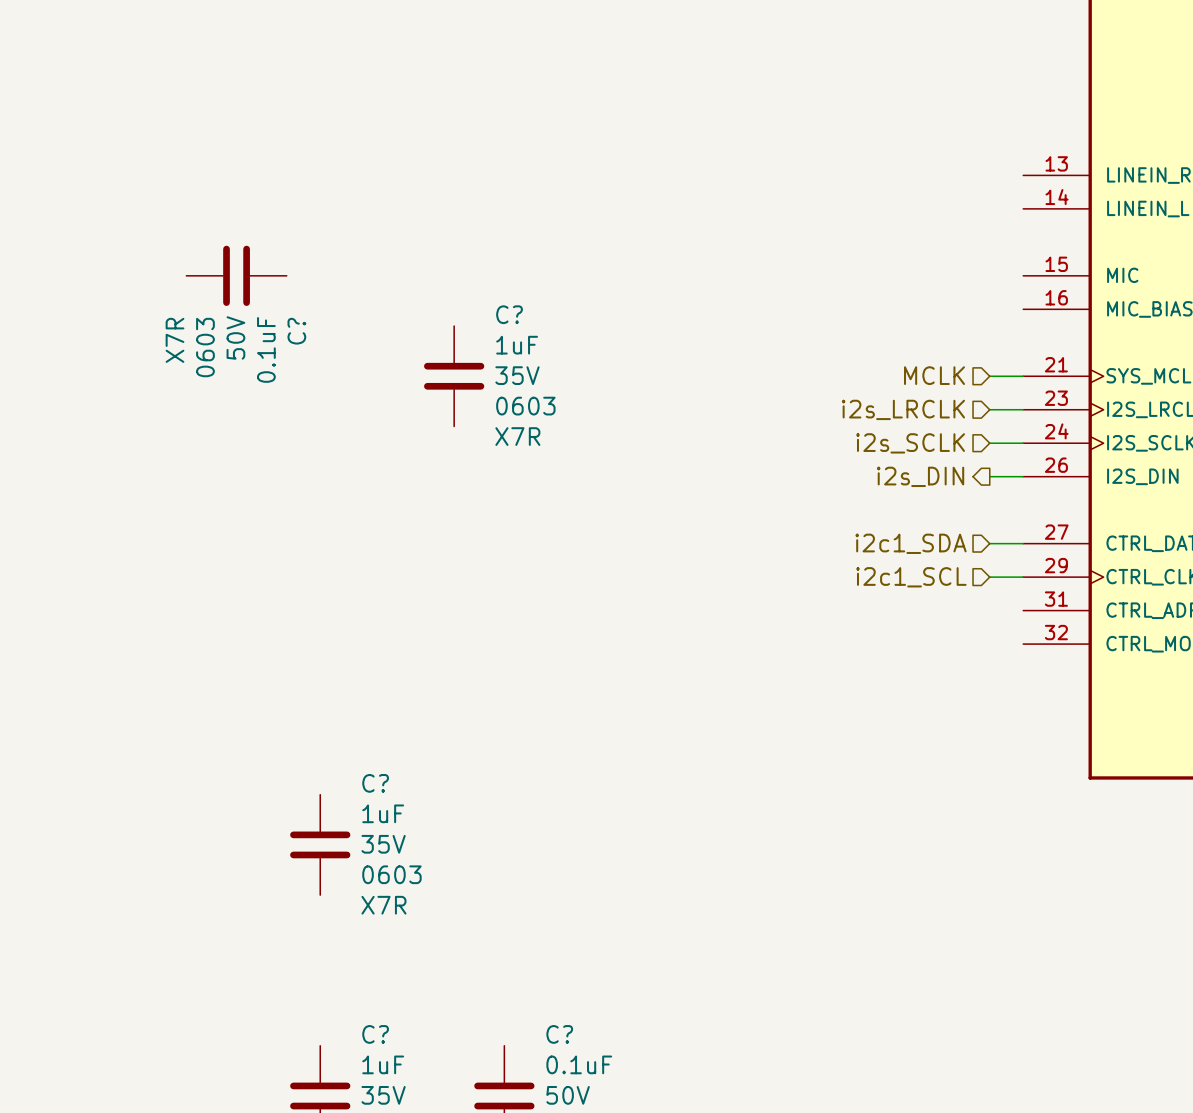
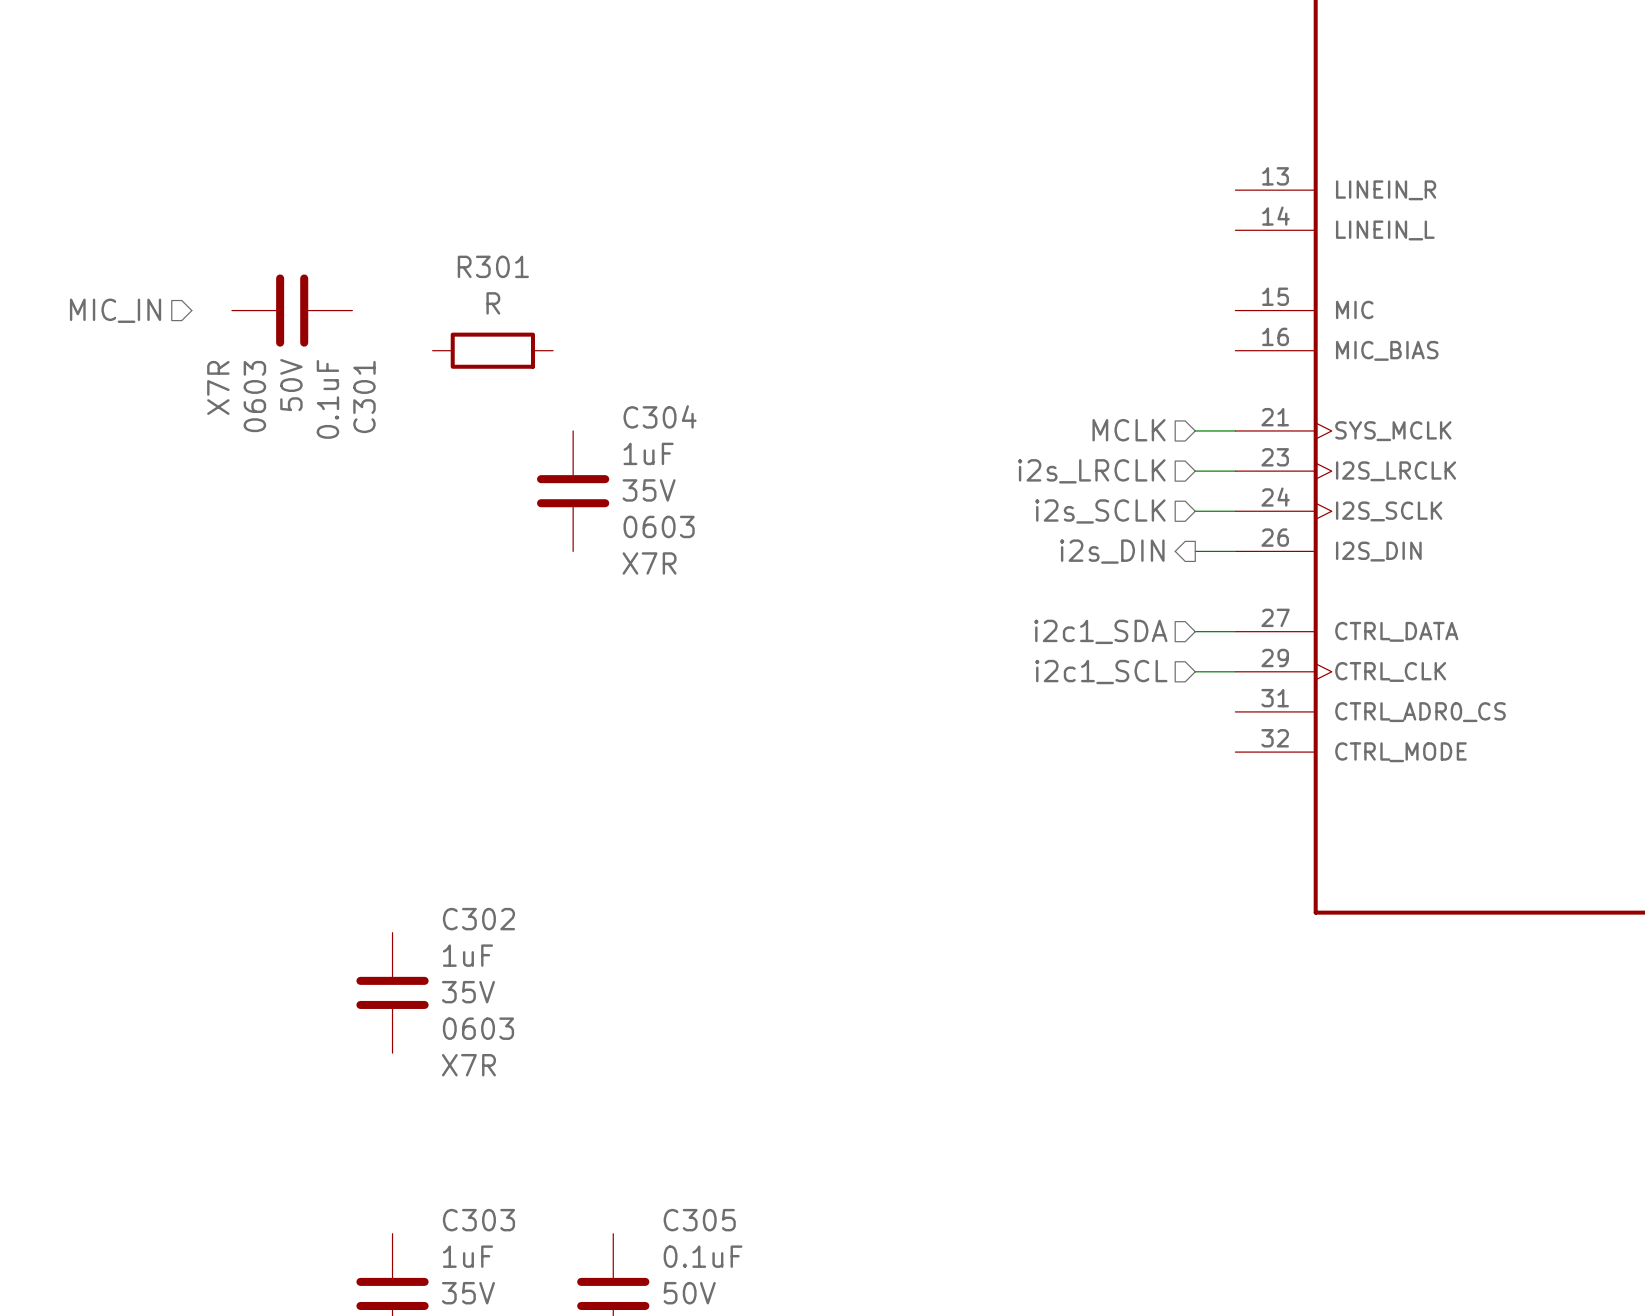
hierarchical label: none -> MIC_IN (115, 310)
R301: none -> R (492, 350)
C? name: C? (296, 331) -> C301 (364, 397)
C?: 1uF (454, 376) -> none
C304: none -> 1uF (573, 491)
C? name: C? (375, 783) -> C302 (478, 919)
C? name: C? (375, 1034) -> C303 (478, 1220)
C? name: C? (559, 1034) -> C305 (699, 1220)

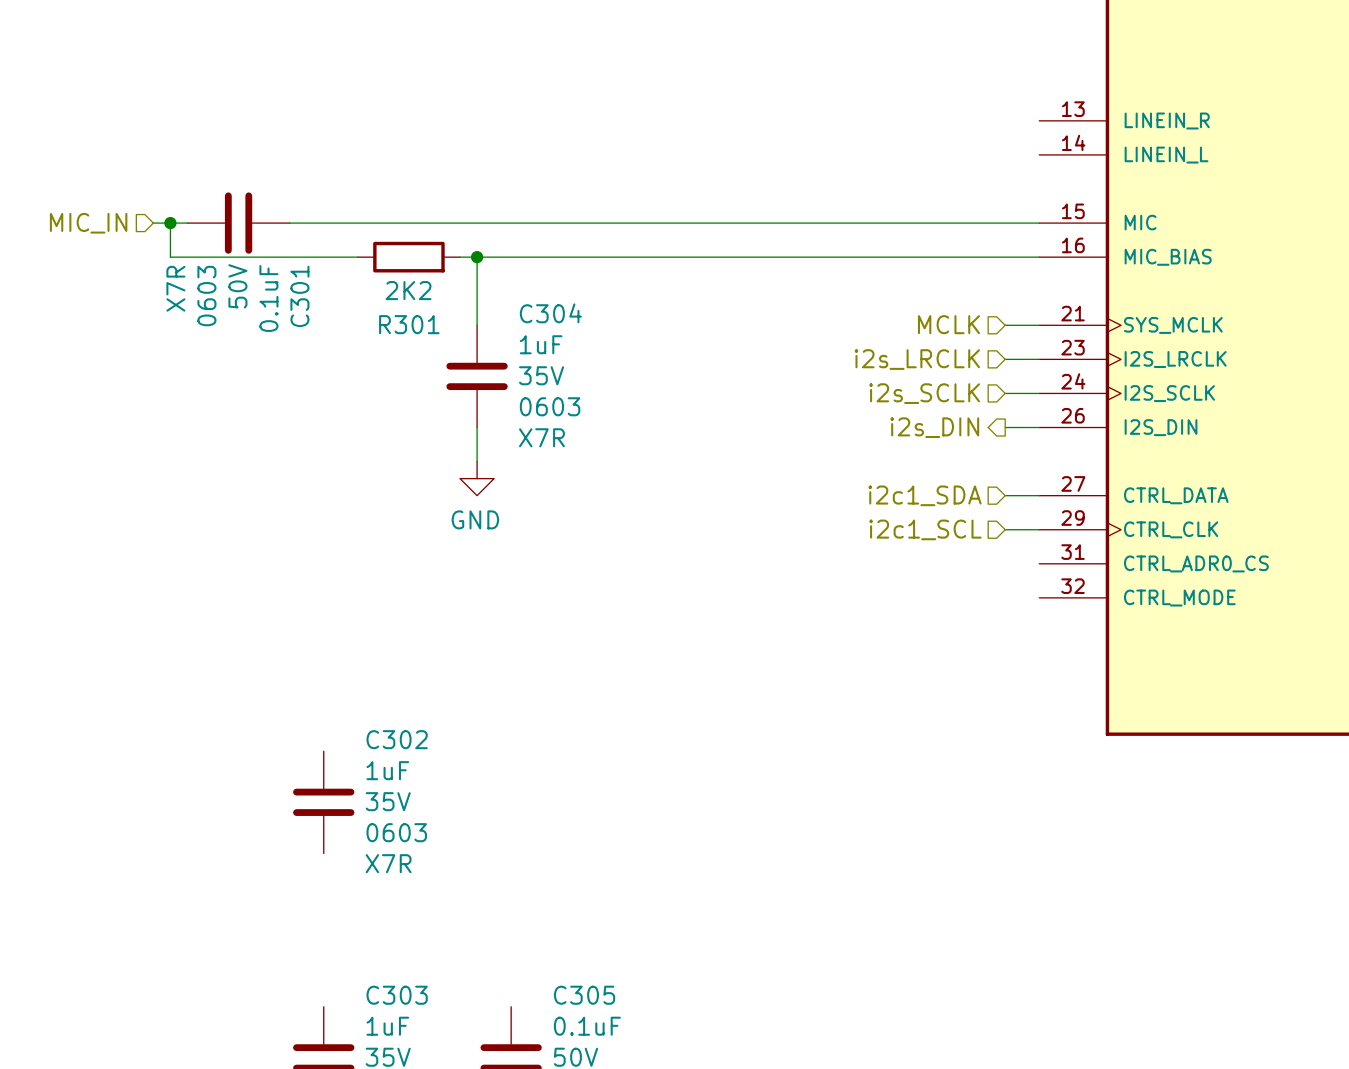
R301 name position: R301 (493, 266) -> R301 (409, 324)
R301 value: R (493, 303) -> 2K2 (408, 290)
wire: none -> (153, 223) (187, 223)
wire: none -> (170, 223) (170, 257) (357, 257)
junction: none -> (170, 223)
wire: none -> (289, 223) (1039, 223)
wire: none -> (460, 257) (1039, 257)
wire: none -> (477, 257) (477, 325)
junction: none -> (477, 257)
wire: none -> (477, 427) (477, 461)
power symbol: none -> GND (477, 478)

